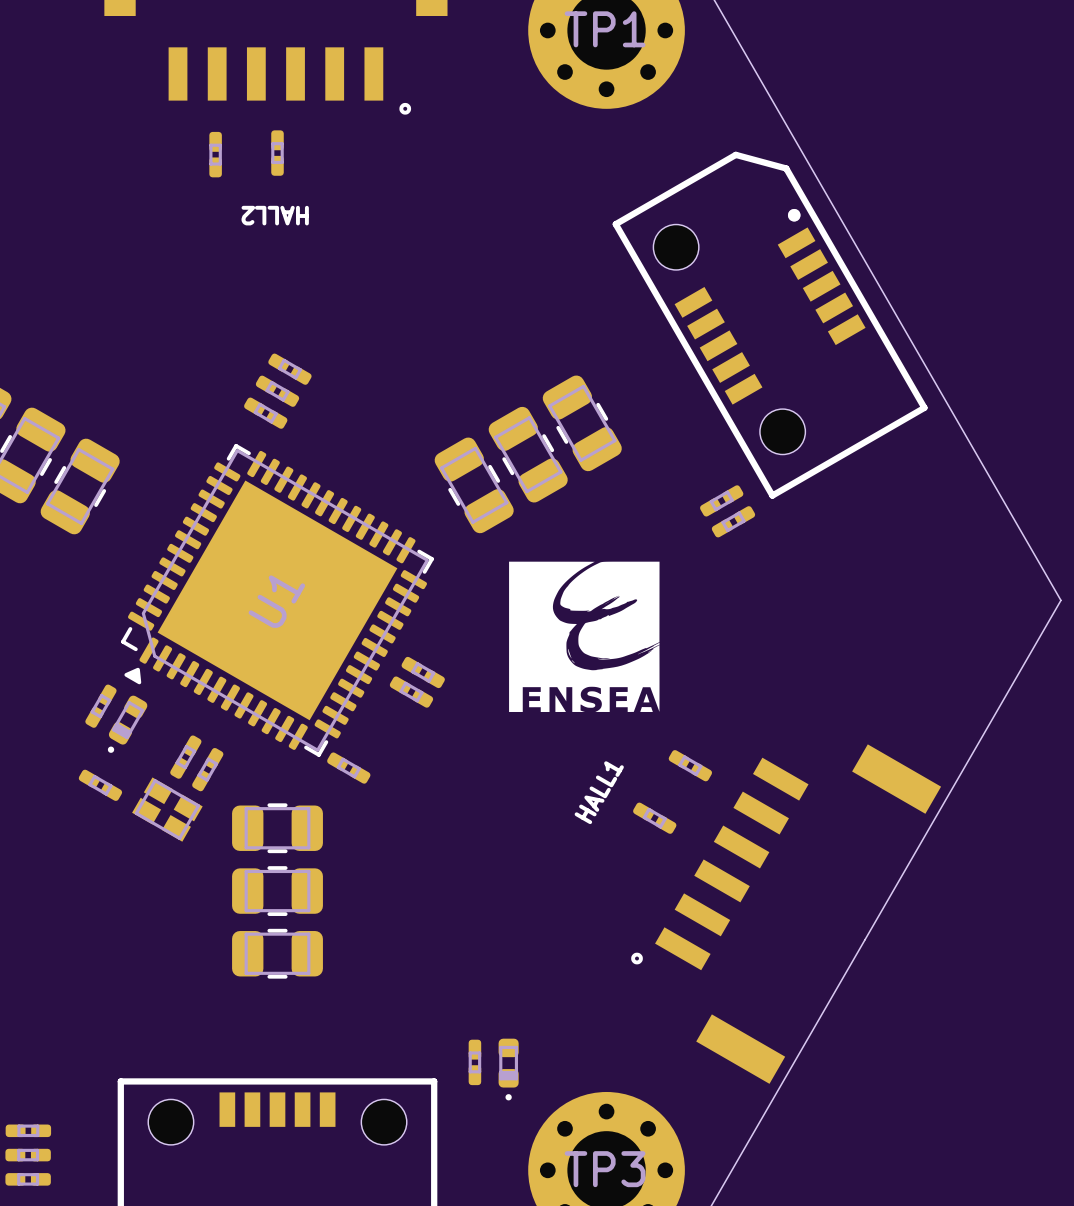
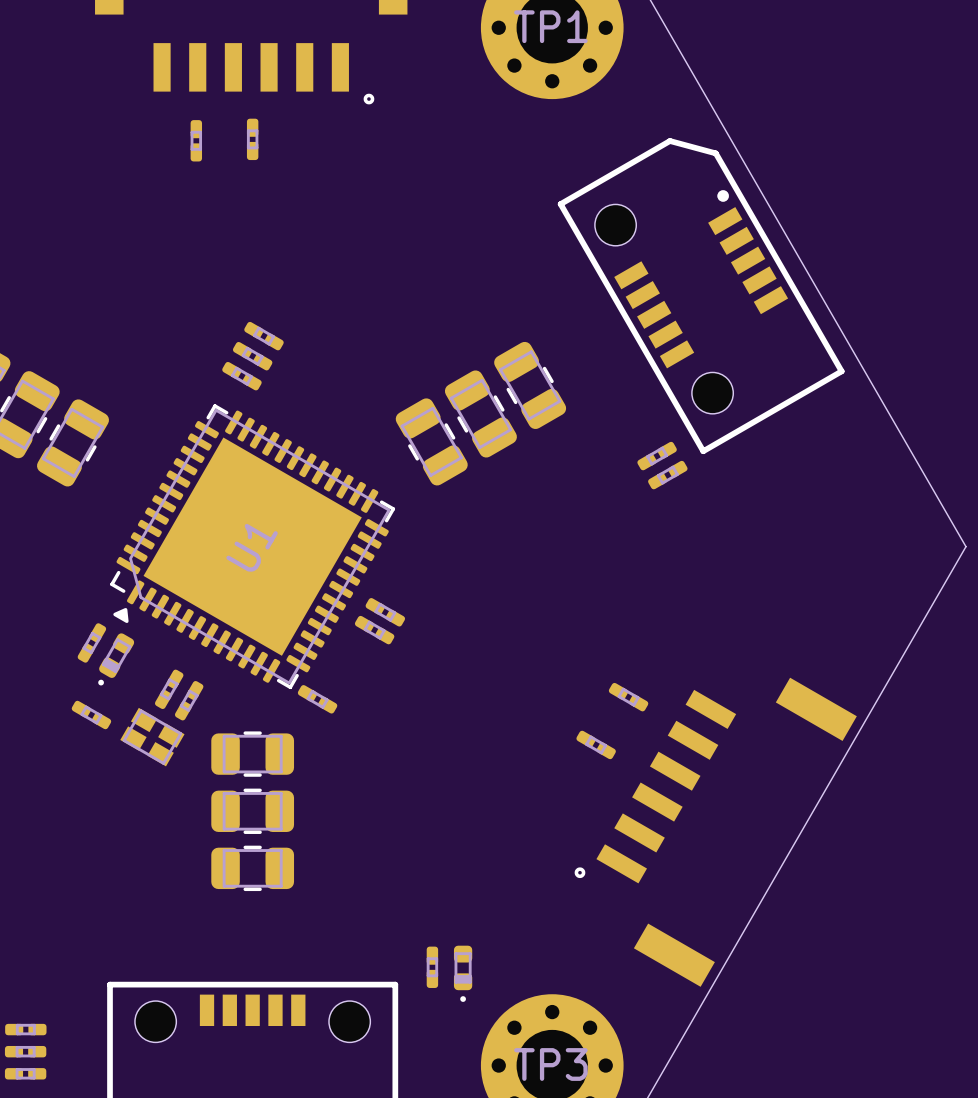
text: HALL2 (275, 215) -> none
drawing: [509, 561, 660, 712] -> none
text: HALL1 (599, 792) -> none

